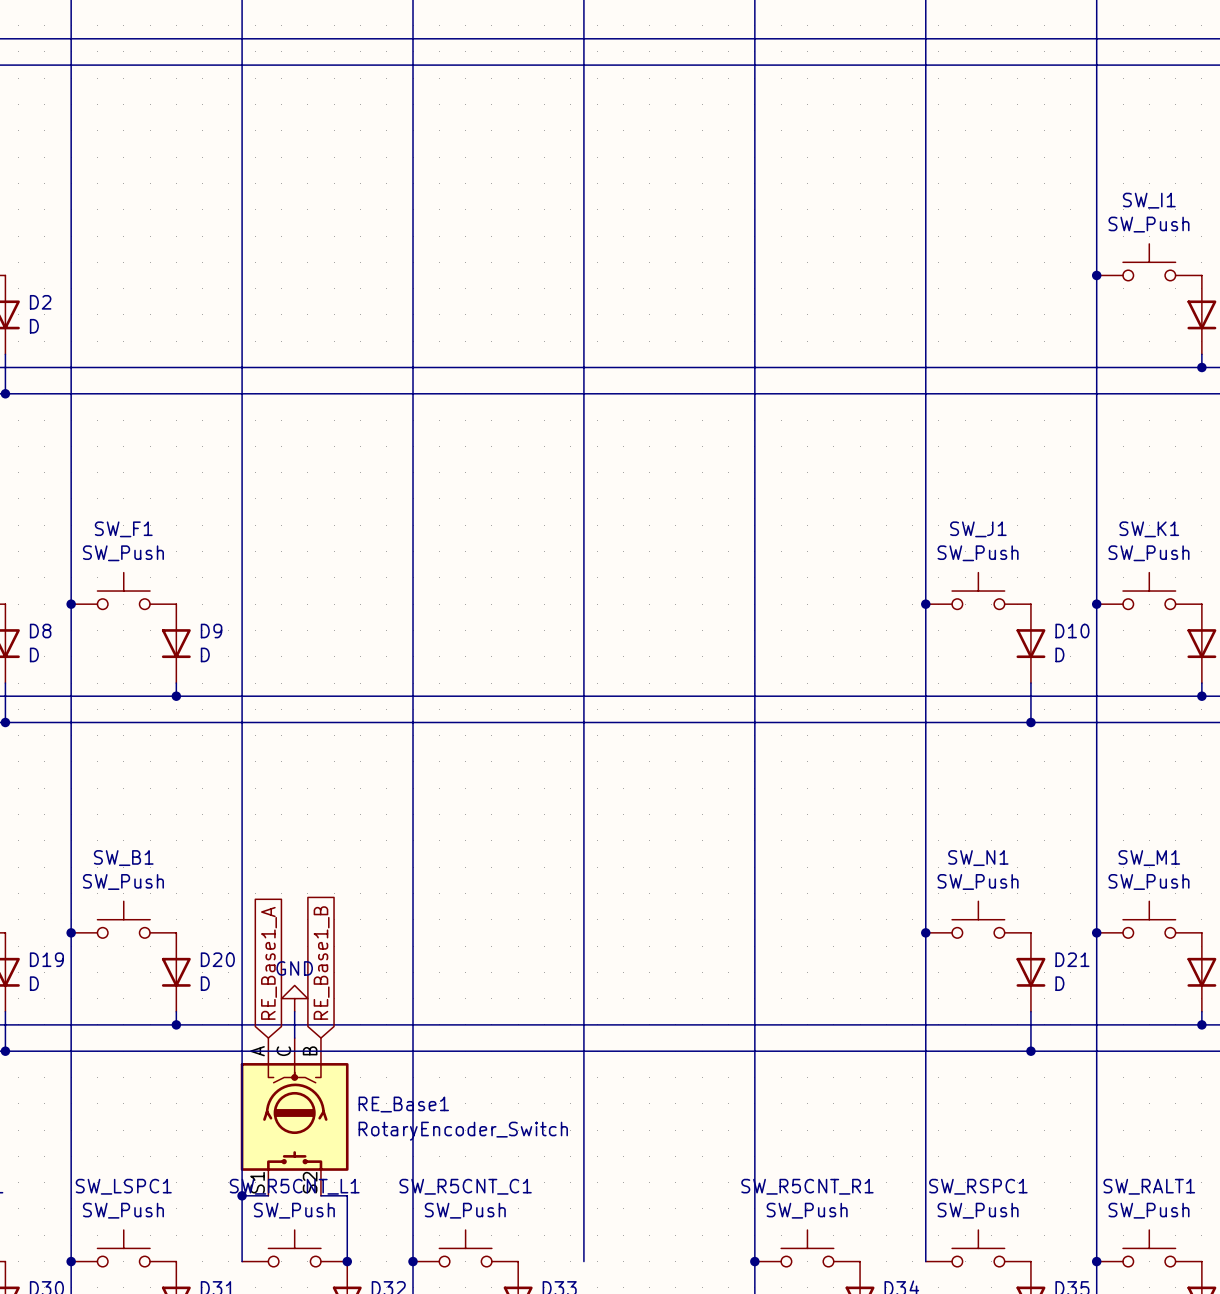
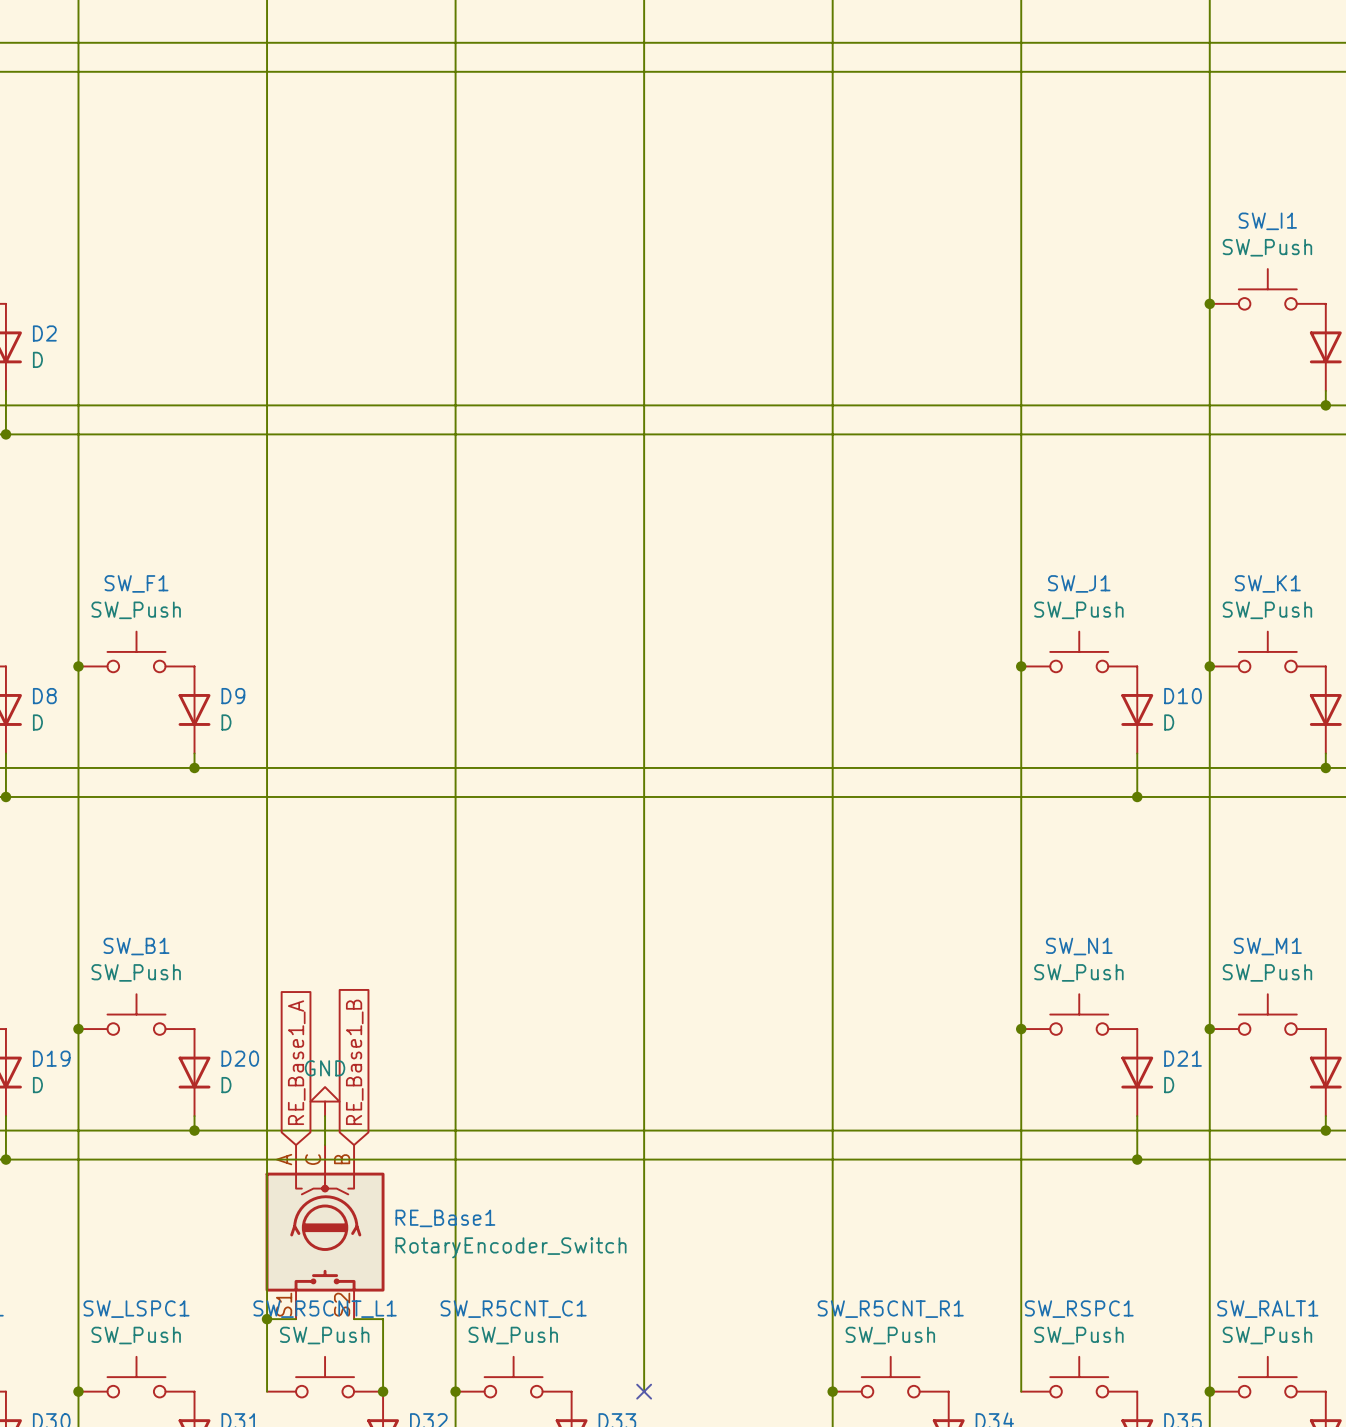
no-connect mark: none -> (644, 1391)

